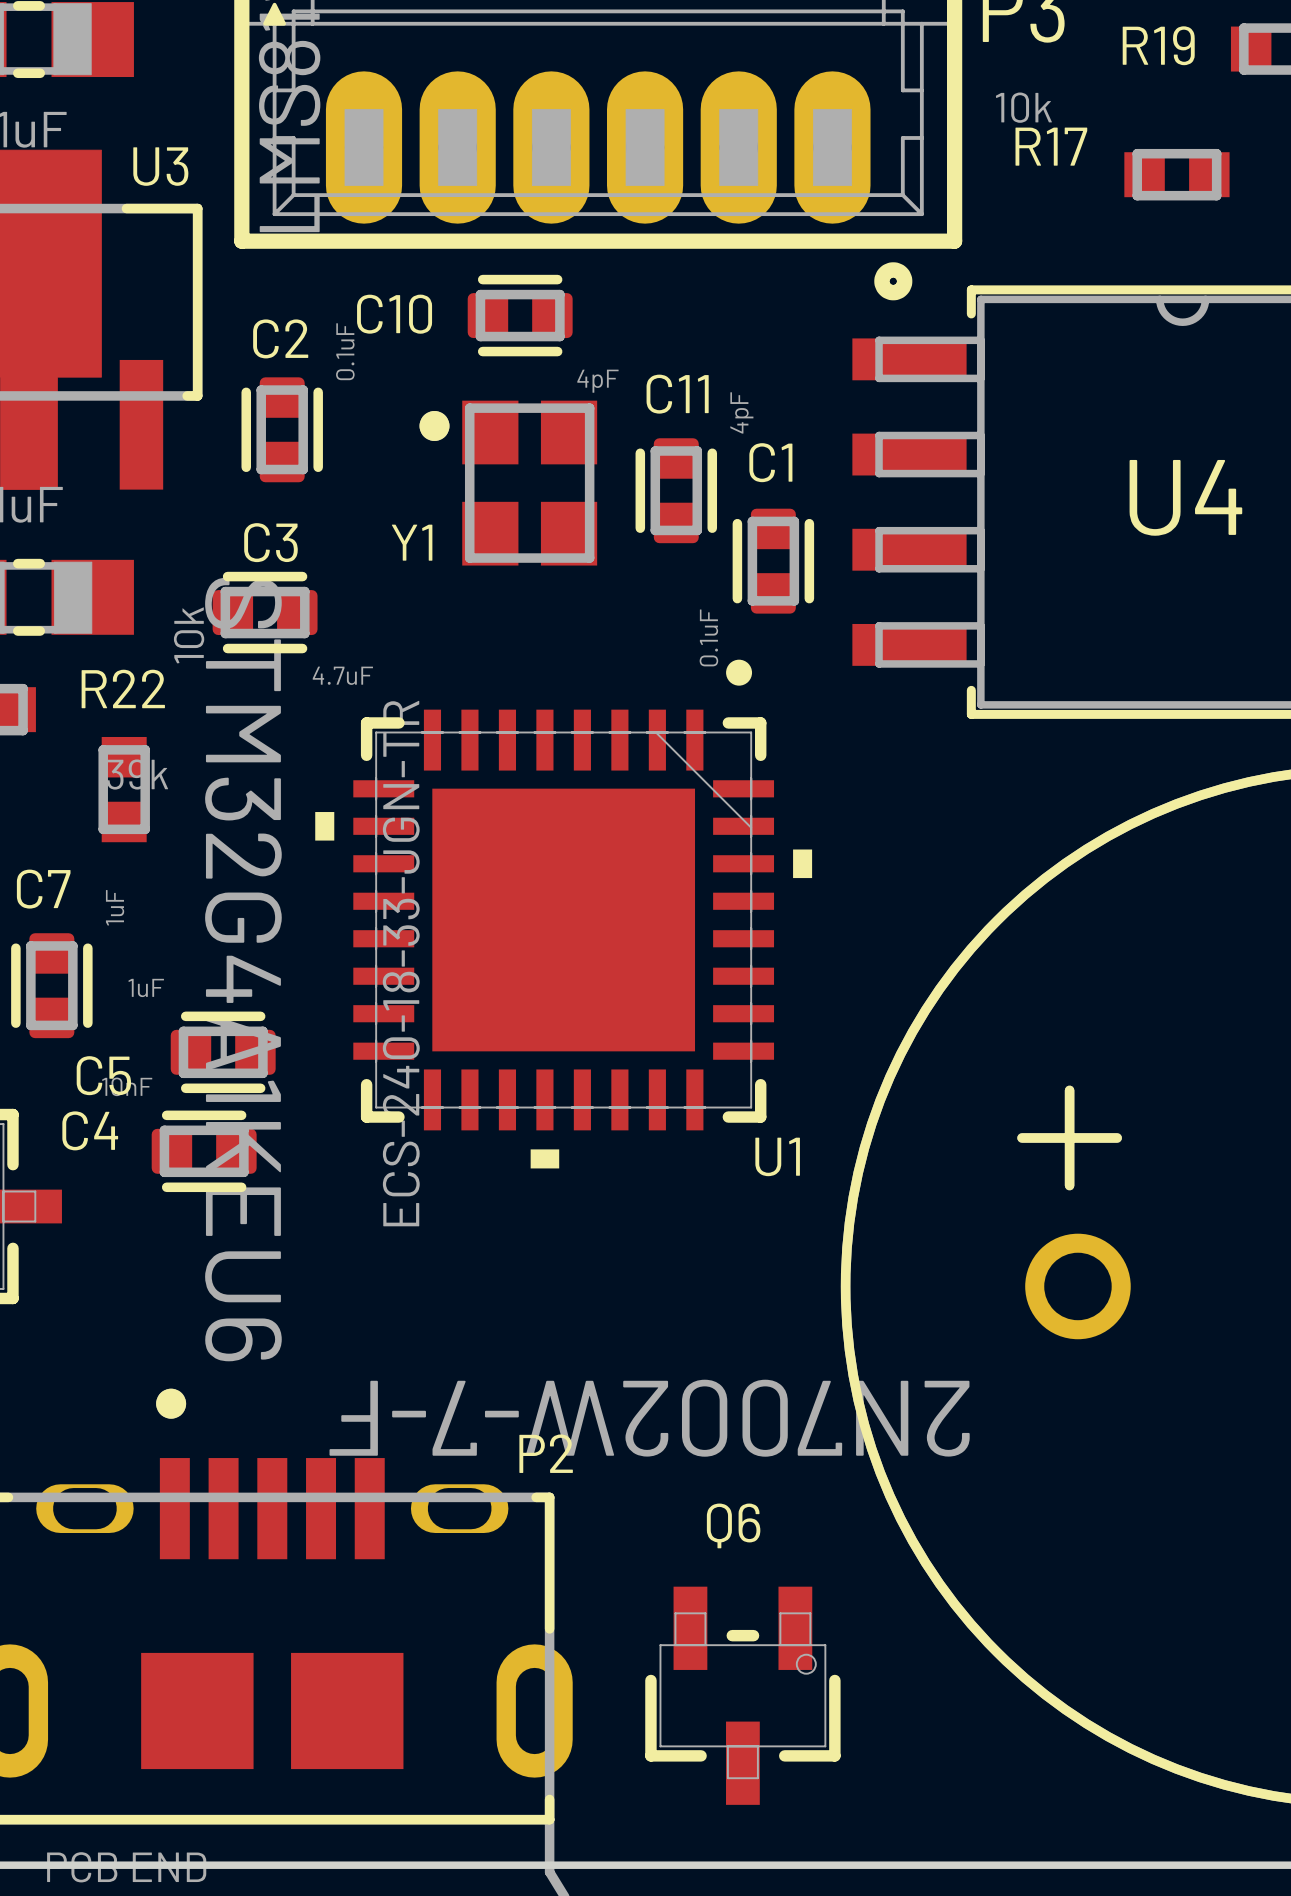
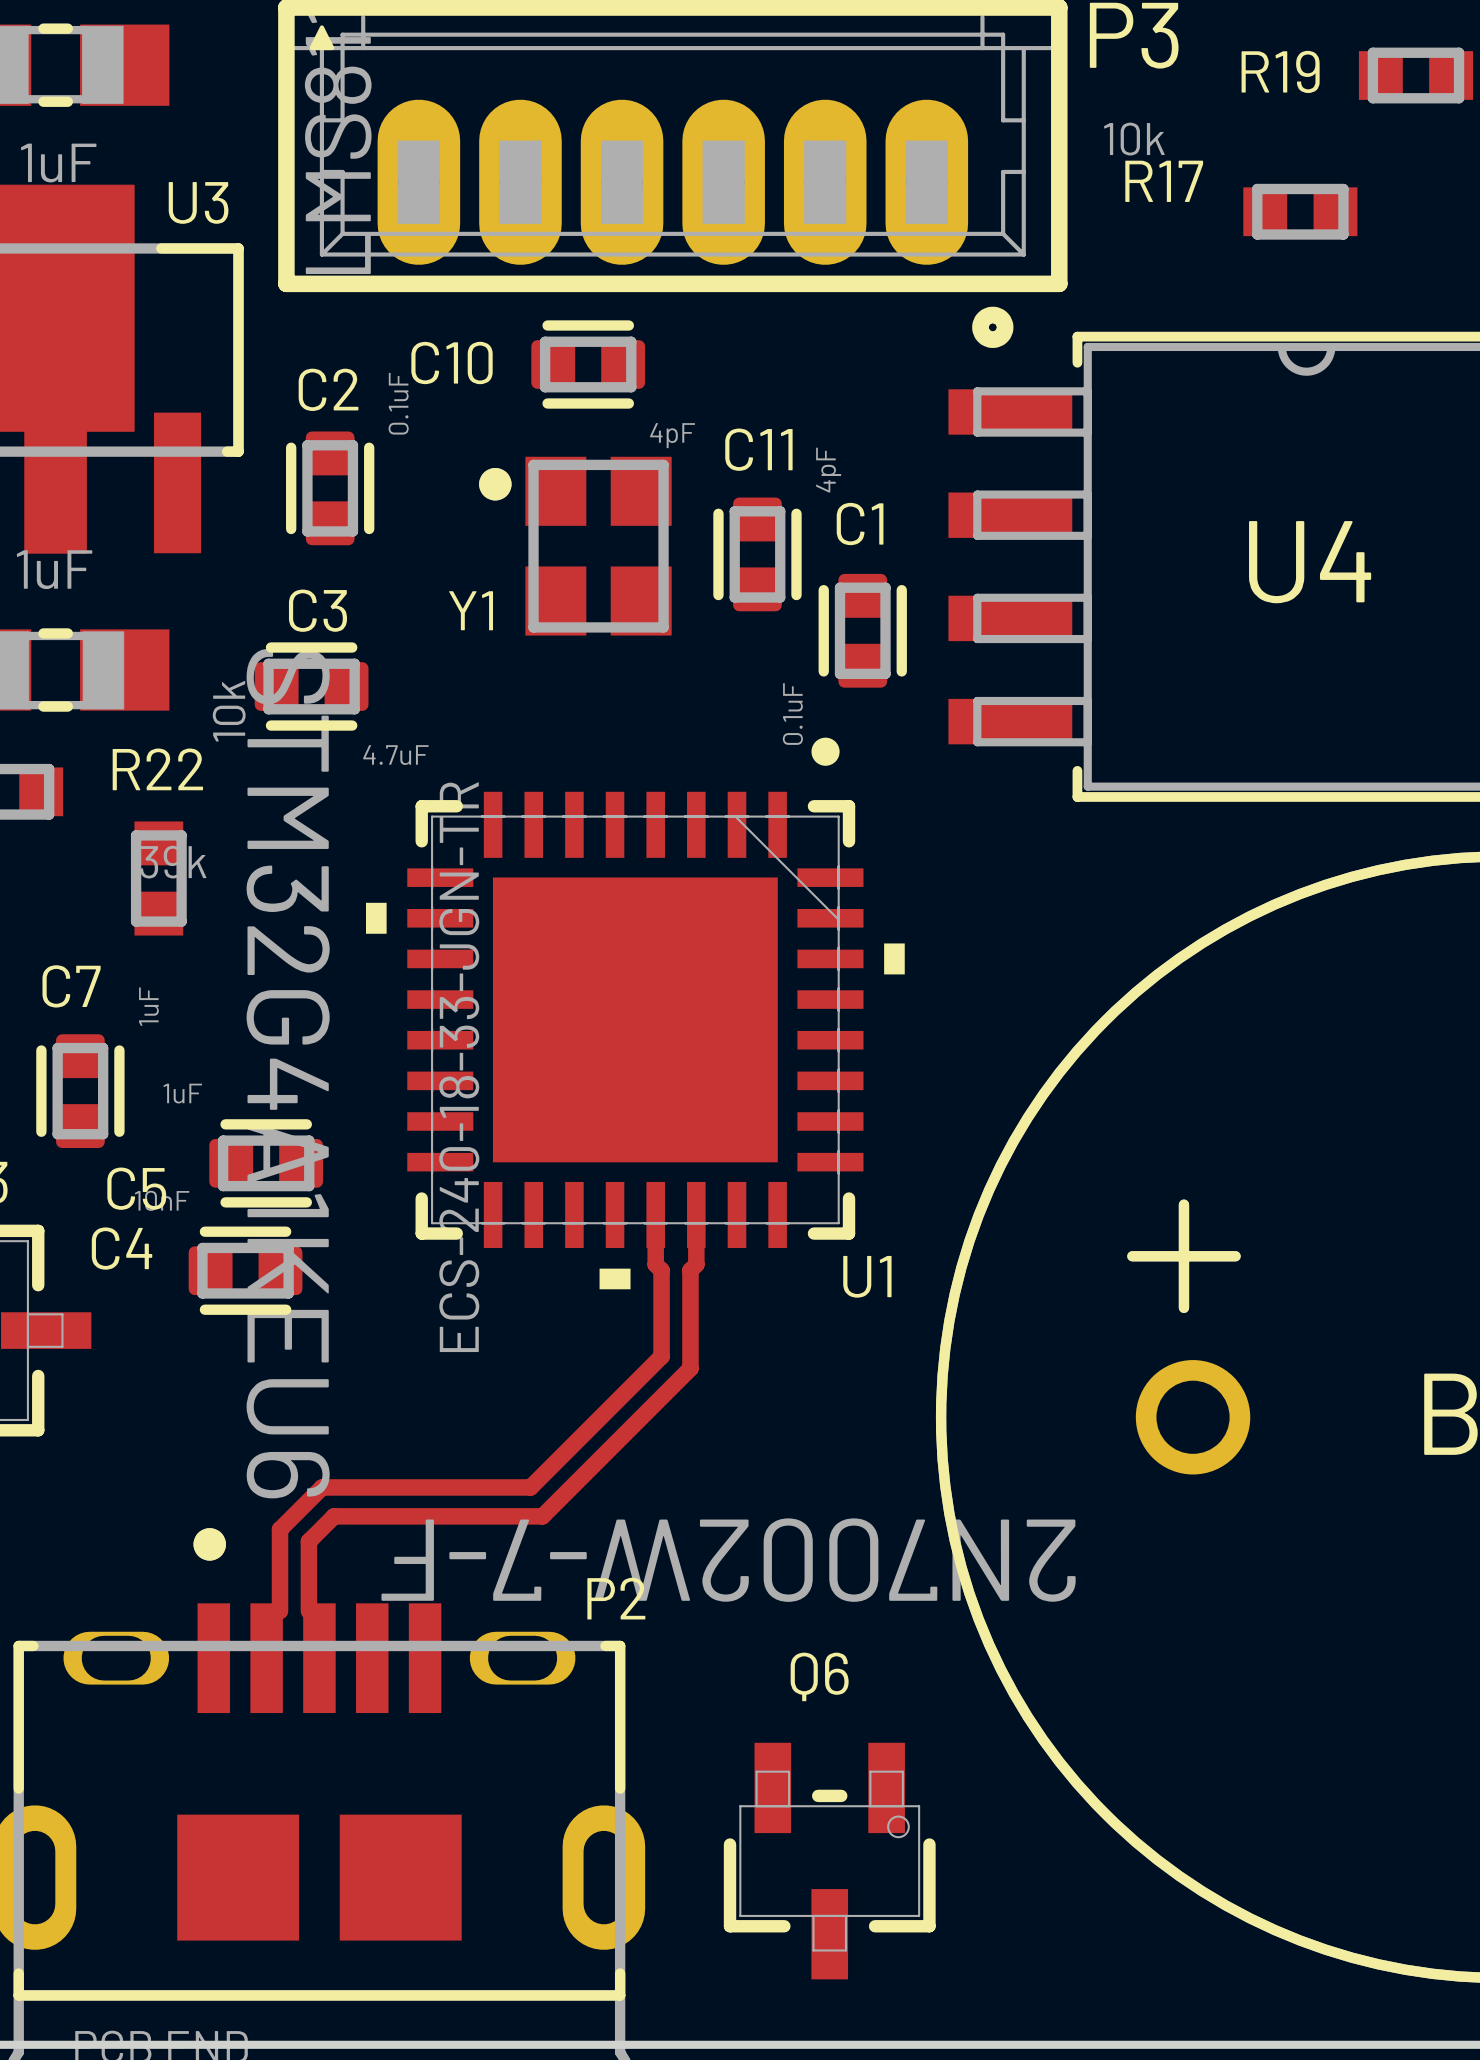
track: none -> (655, 1214) (655, 1264) (661, 1270) (661, 1356) (530, 1487) (322, 1487) (280, 1529) (280, 1611)
track: none -> (696, 1214) (696, 1264) (690, 1270) (690, 1368) (542, 1516) (334, 1516) (308, 1541) (308, 1611)

